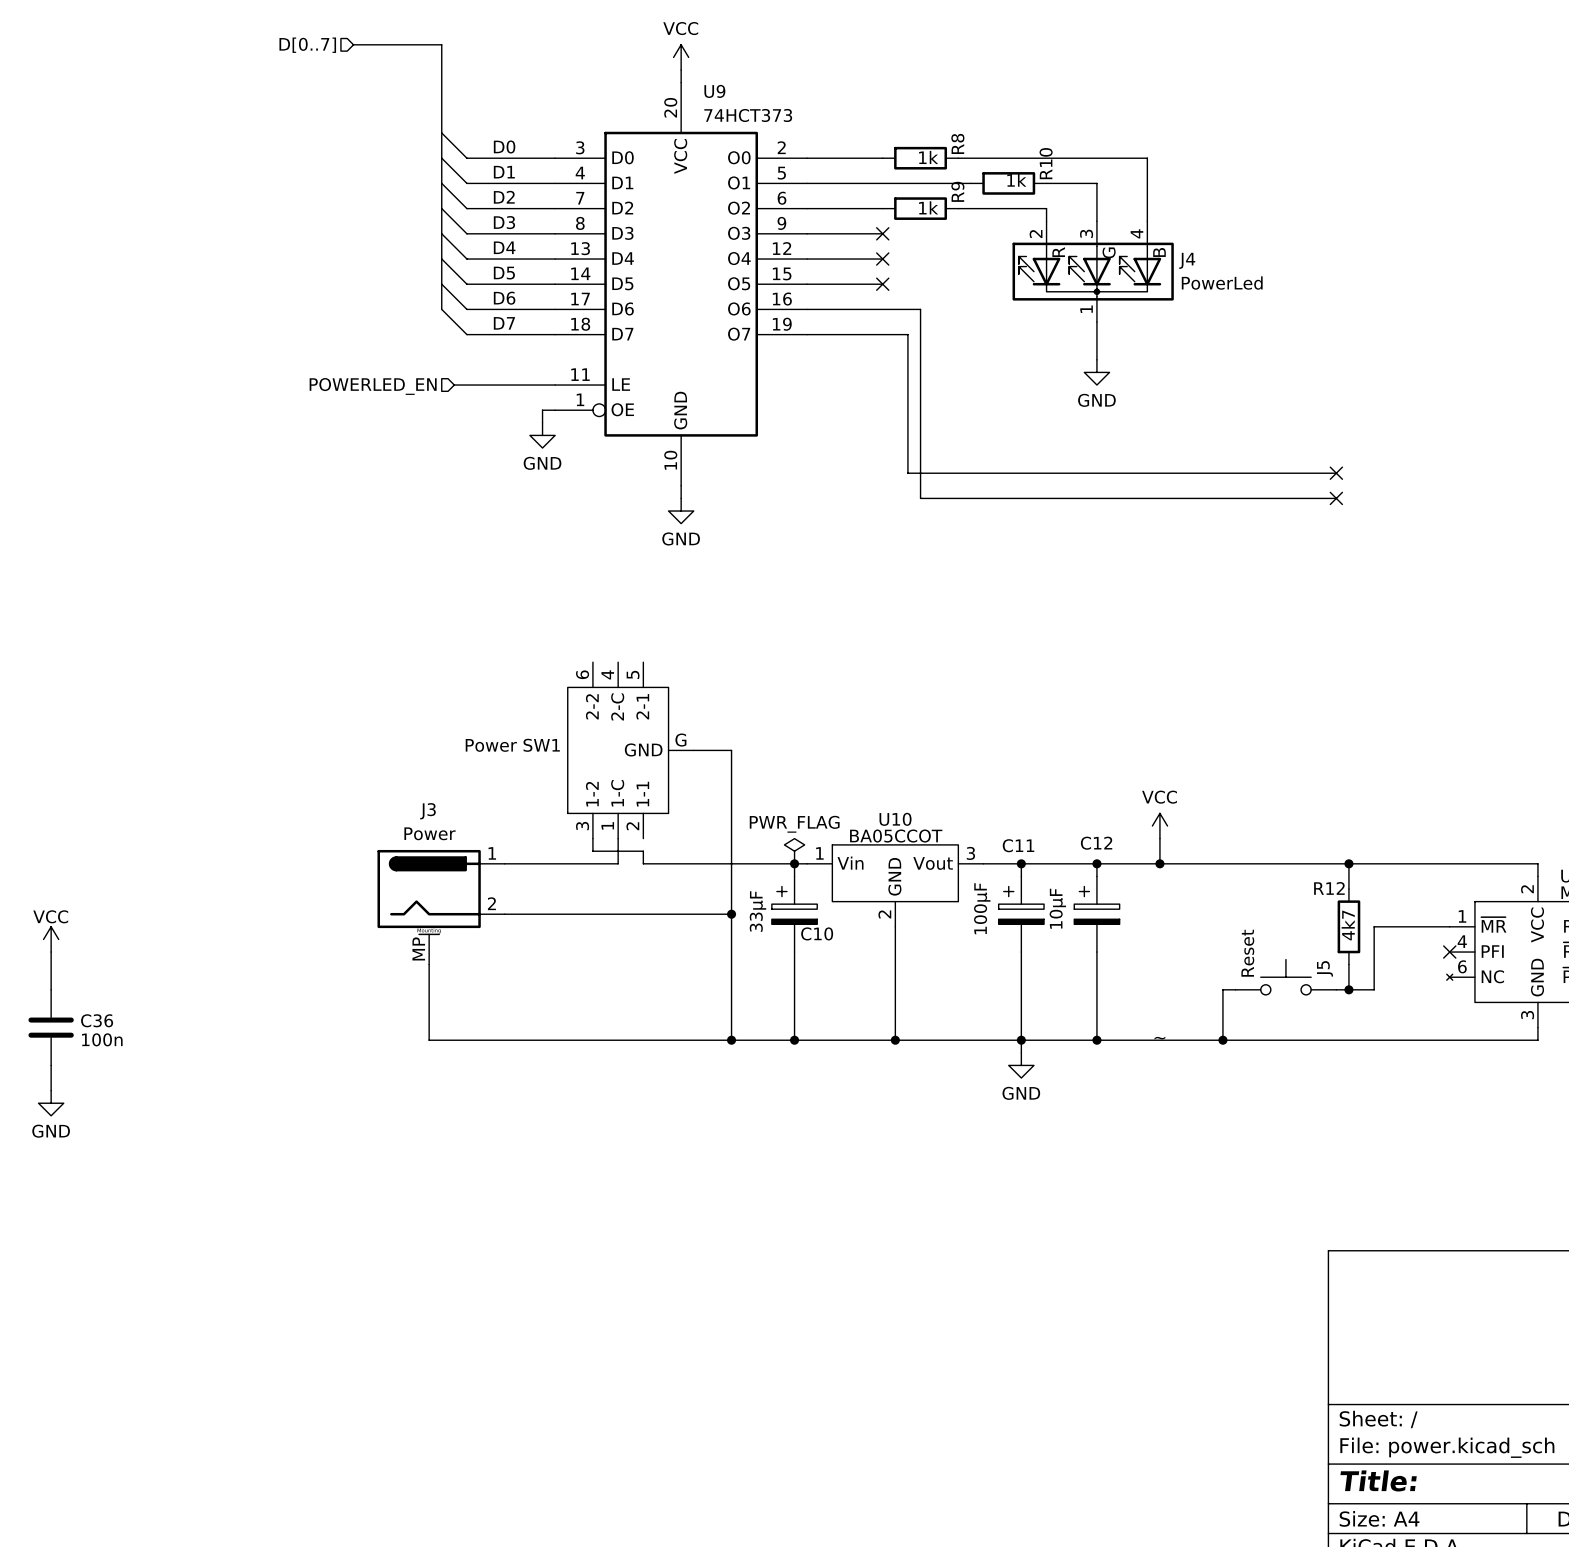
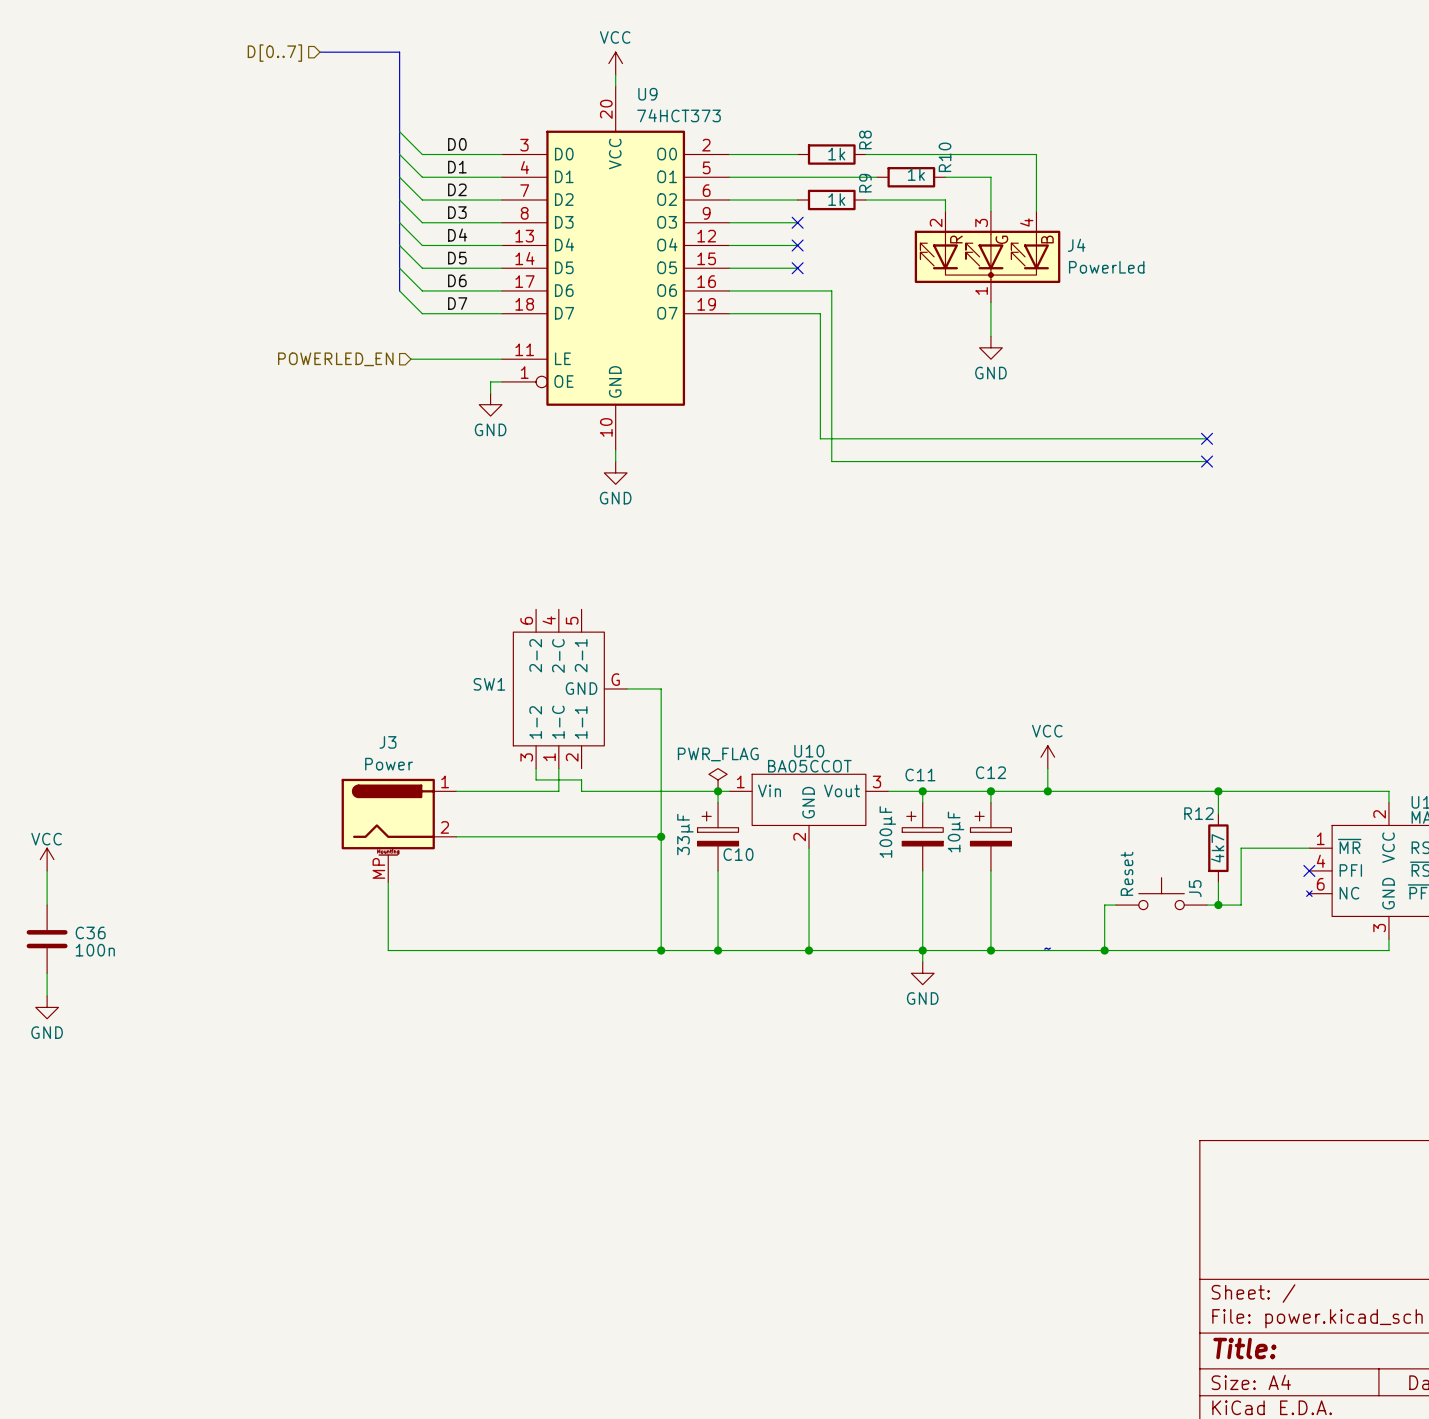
Power SW1 name: Power SW1 (512, 745) -> SW1 (489, 684)

